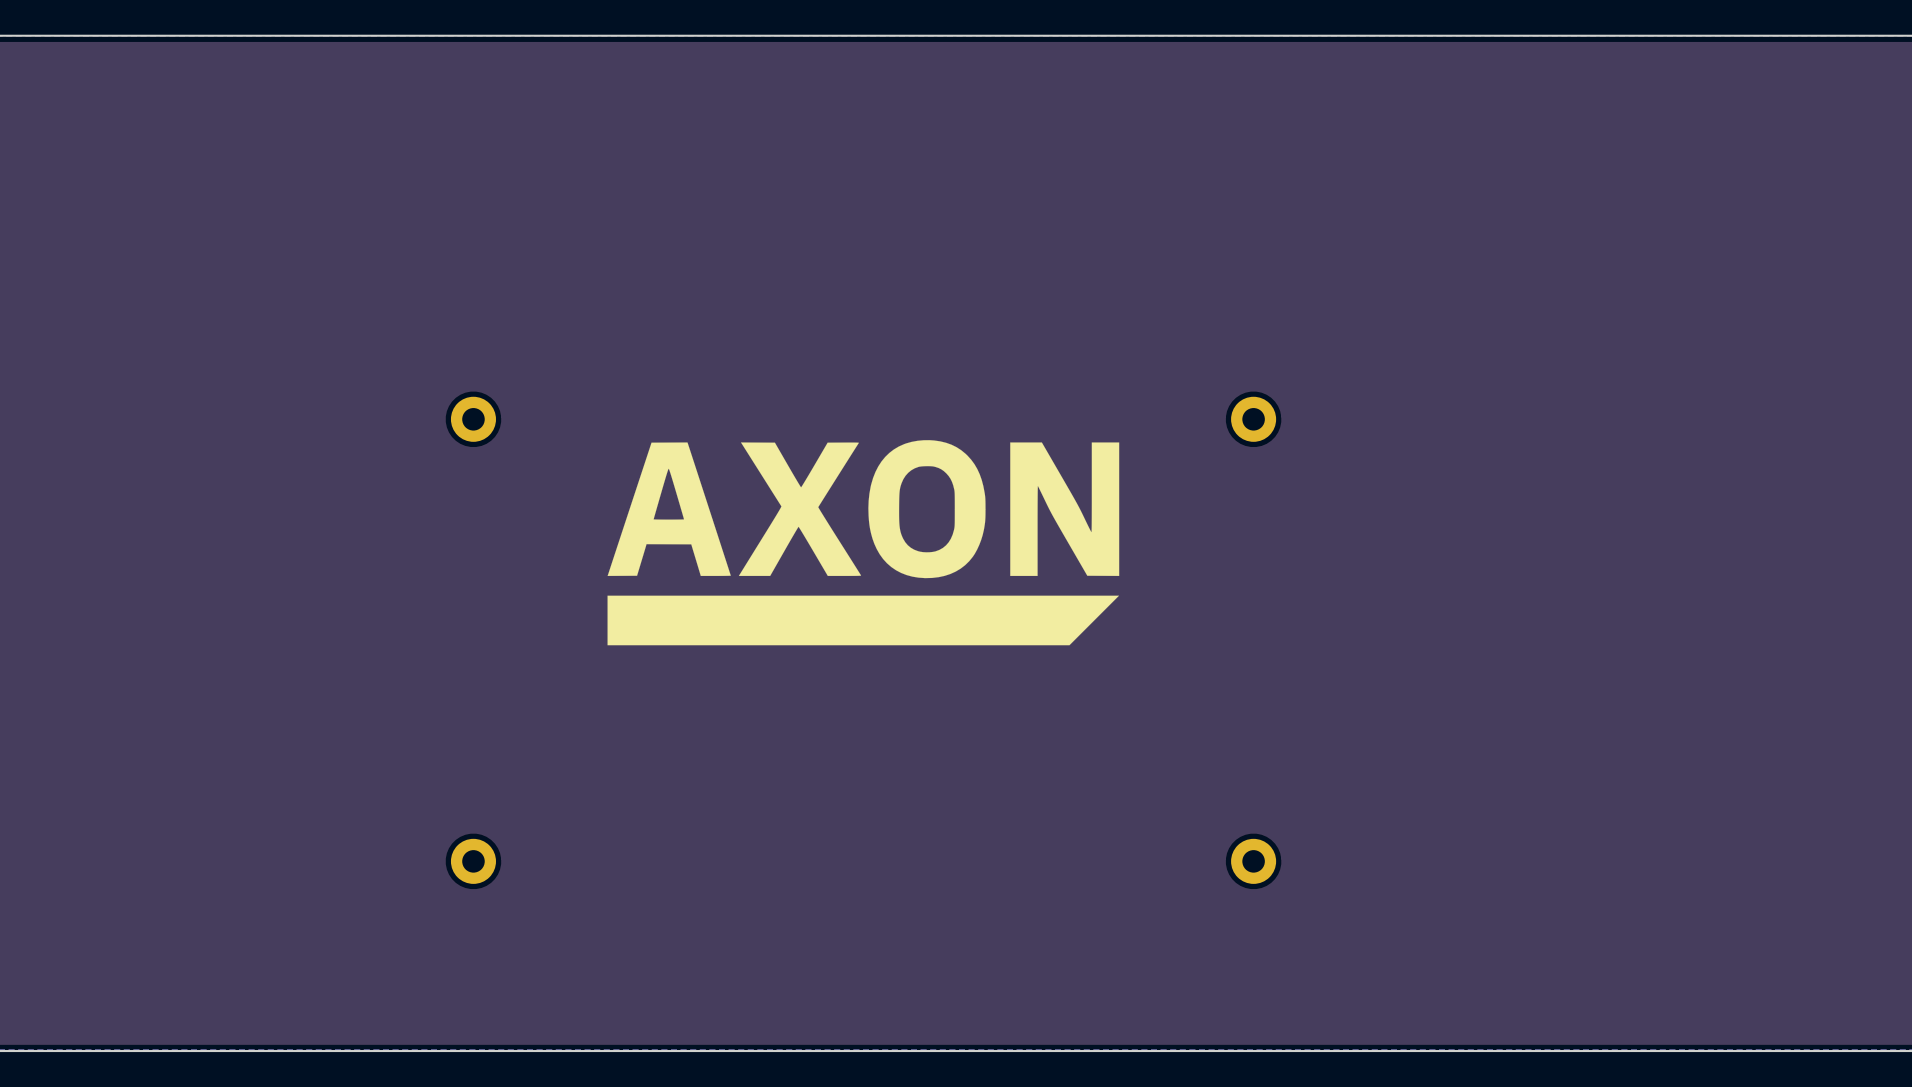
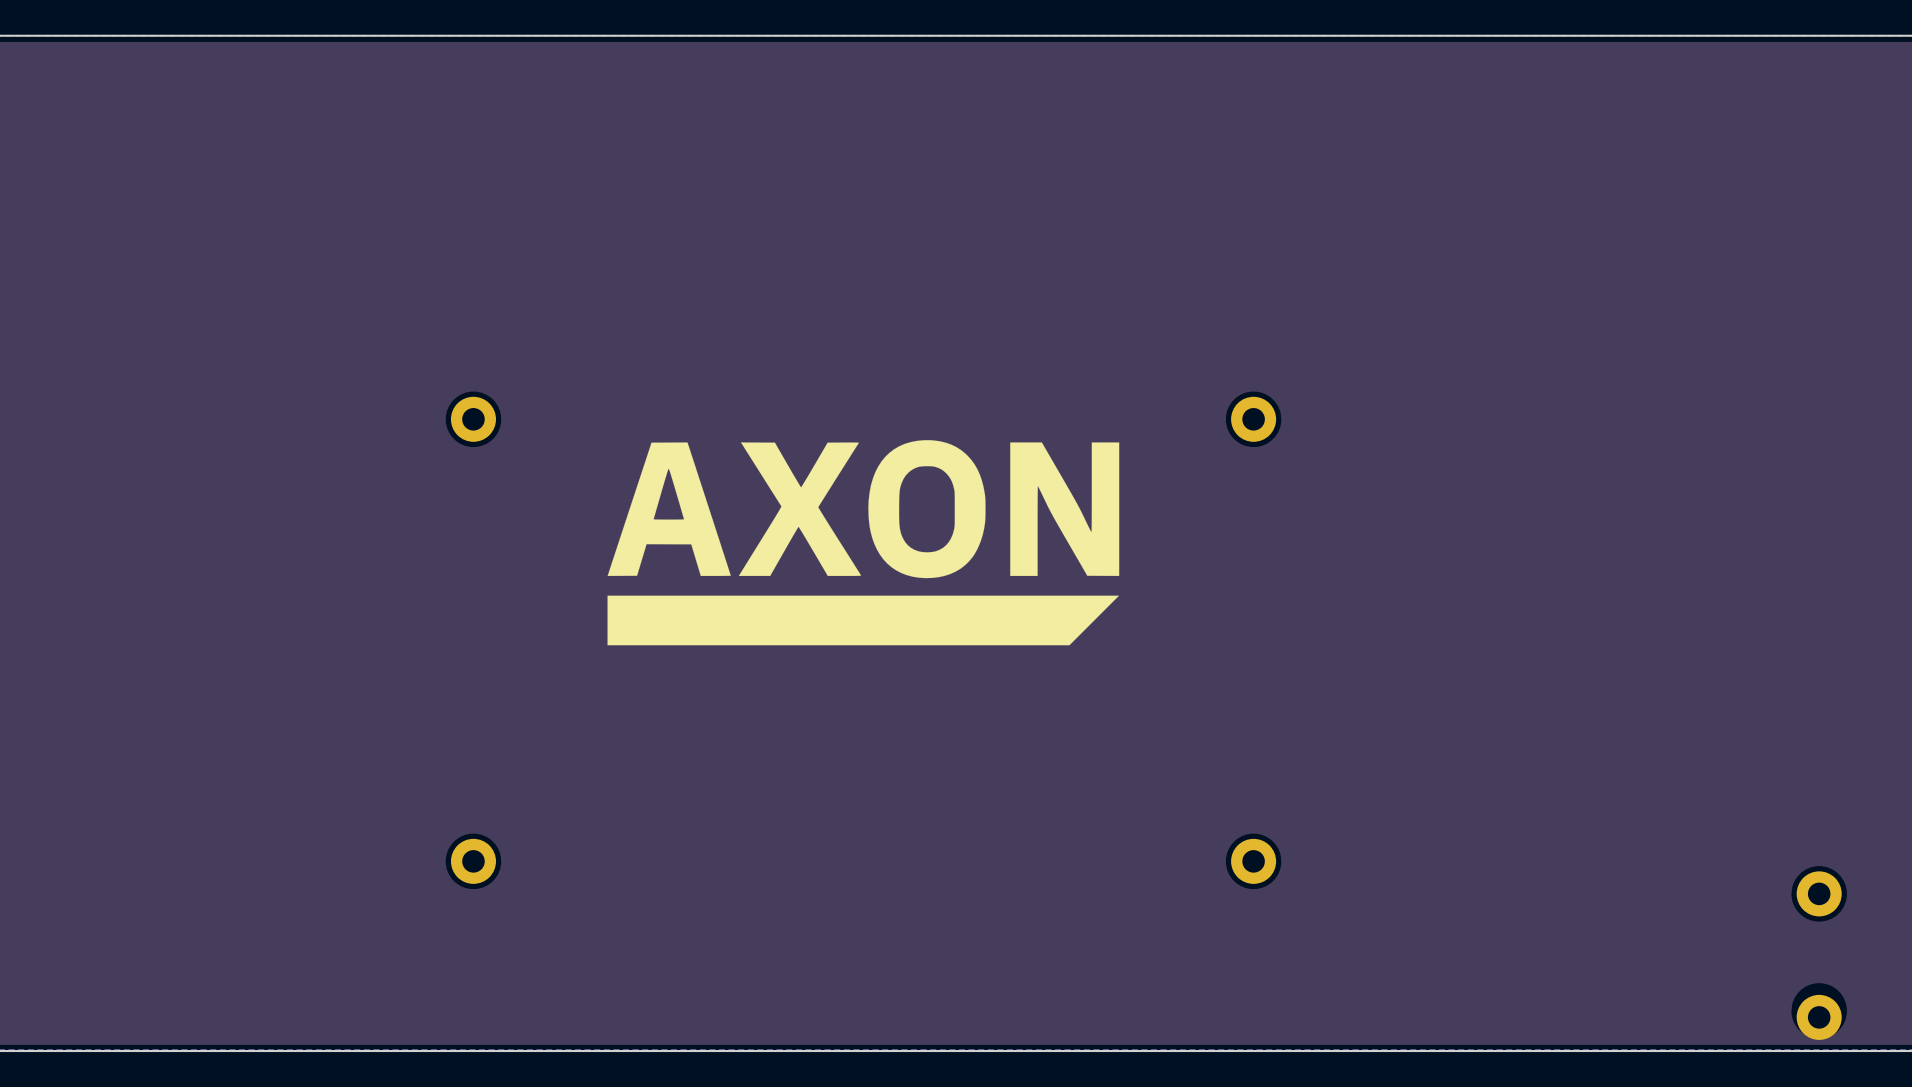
part: none -> (1819, 893)
part: none -> (1819, 1017)

